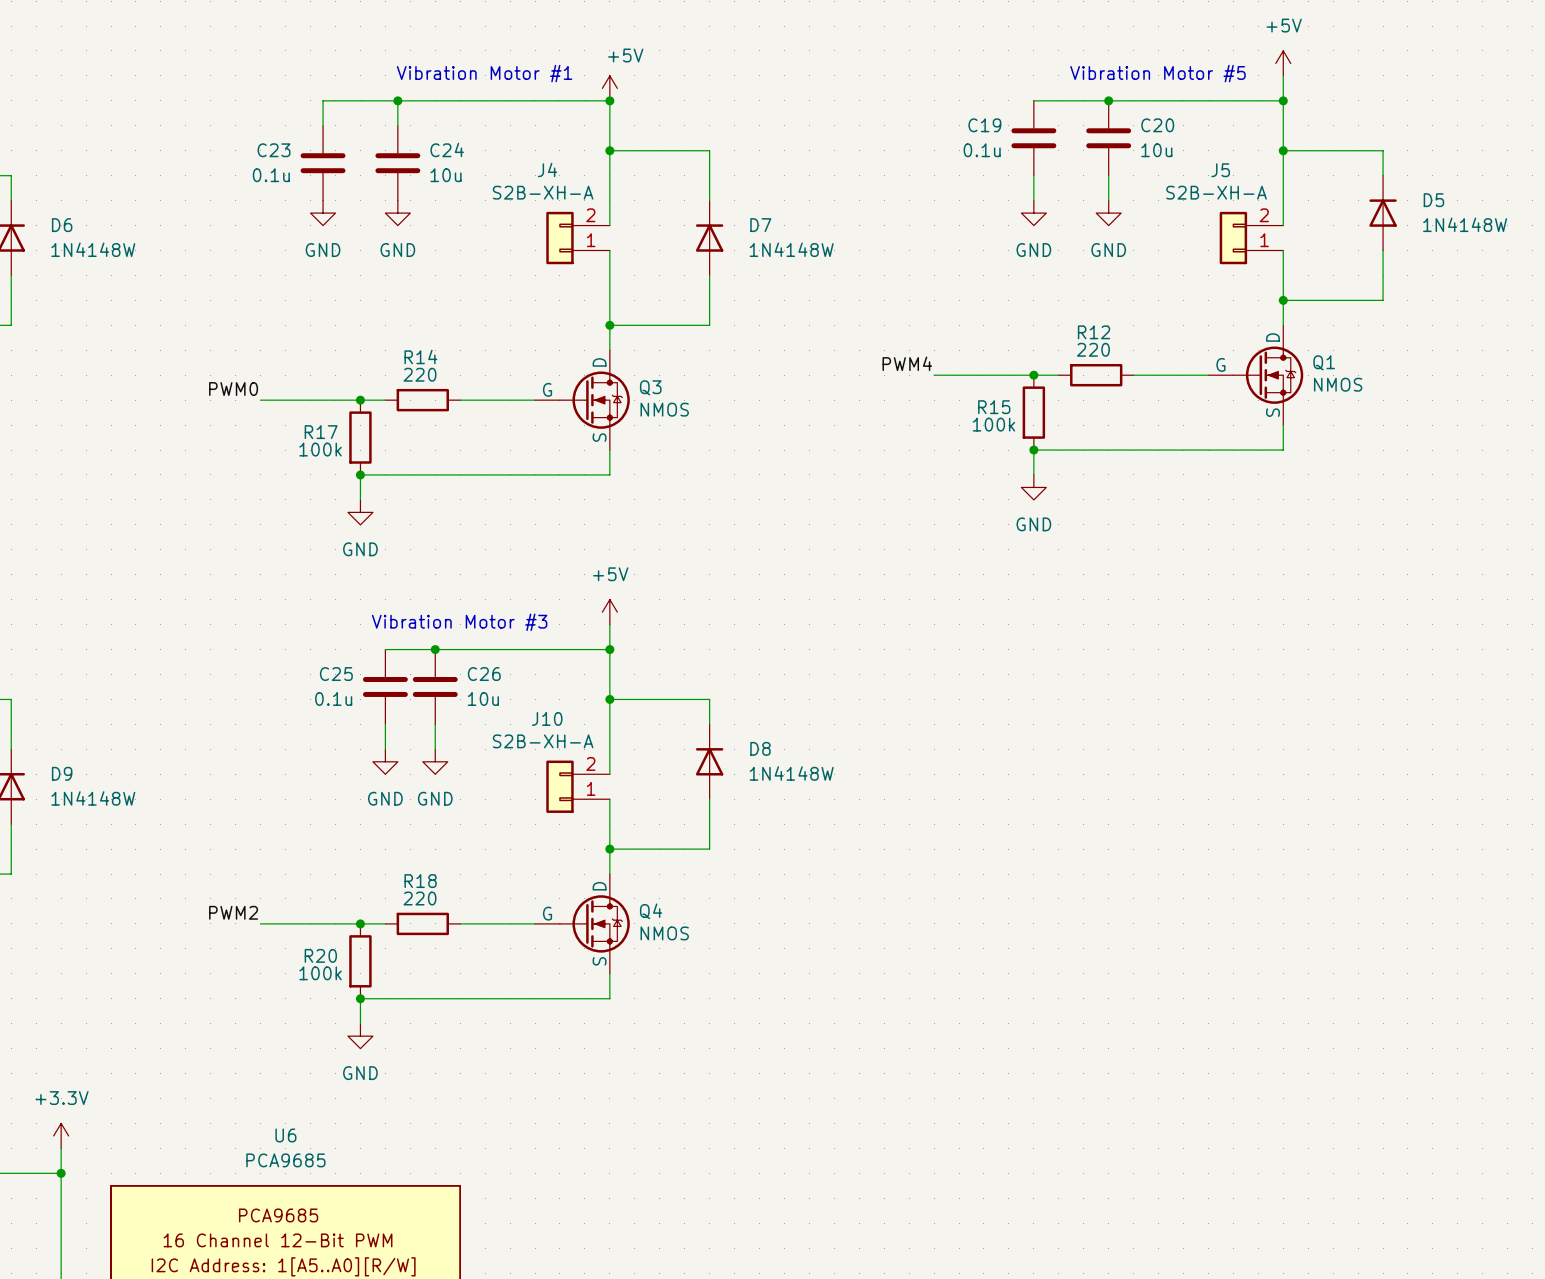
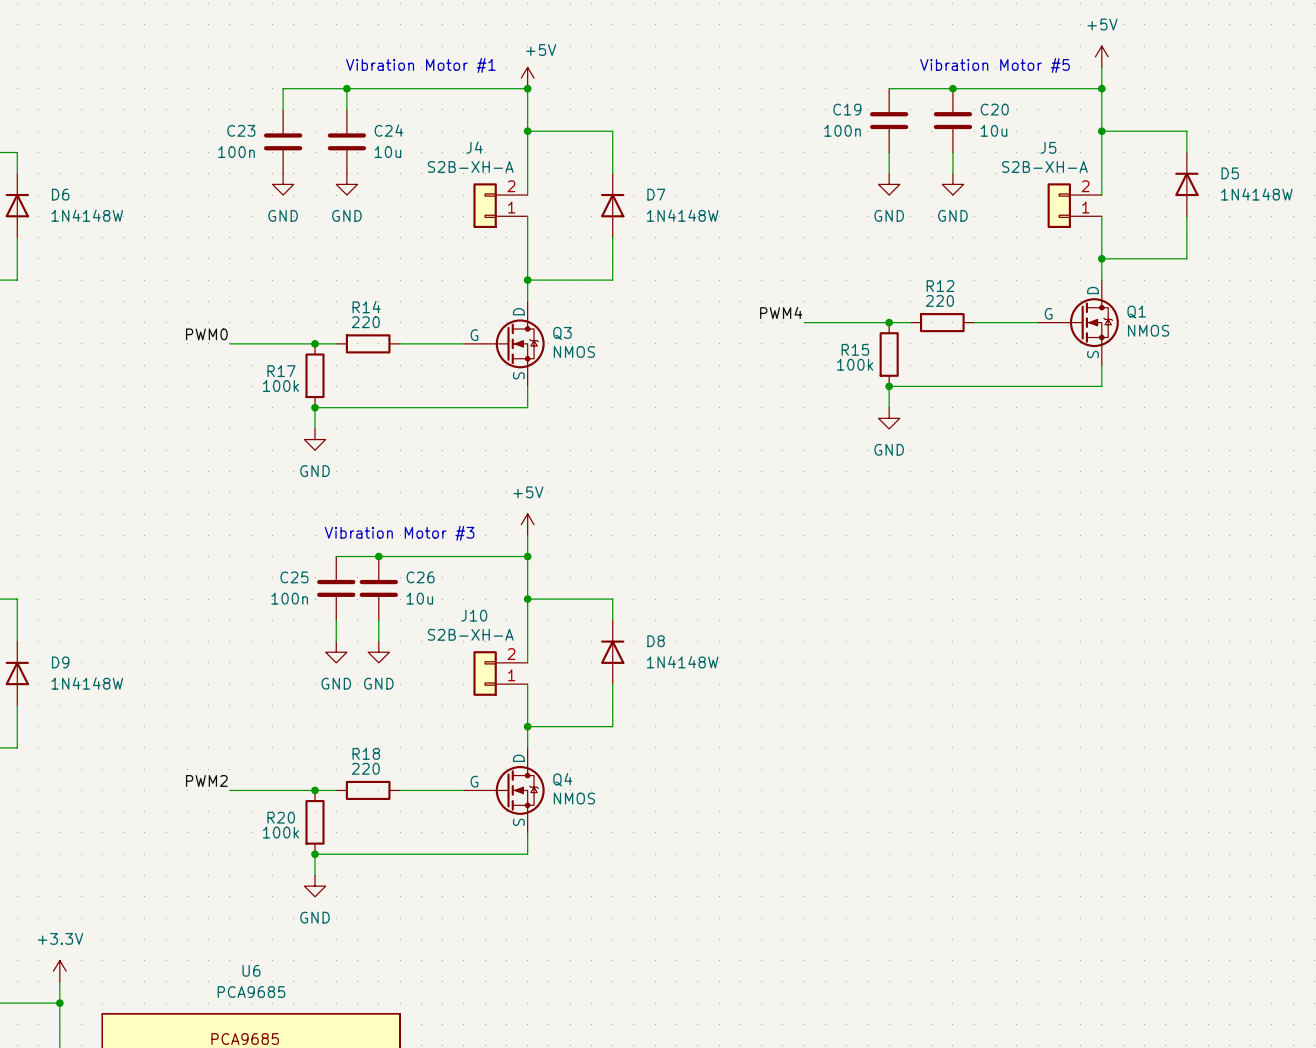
C19 value: 0.1u (982, 150) -> 100n (842, 130)
C23 value: 0.1u (271, 175) -> 100n (236, 152)
C25 value: 0.1u (333, 698) -> 100n (289, 598)

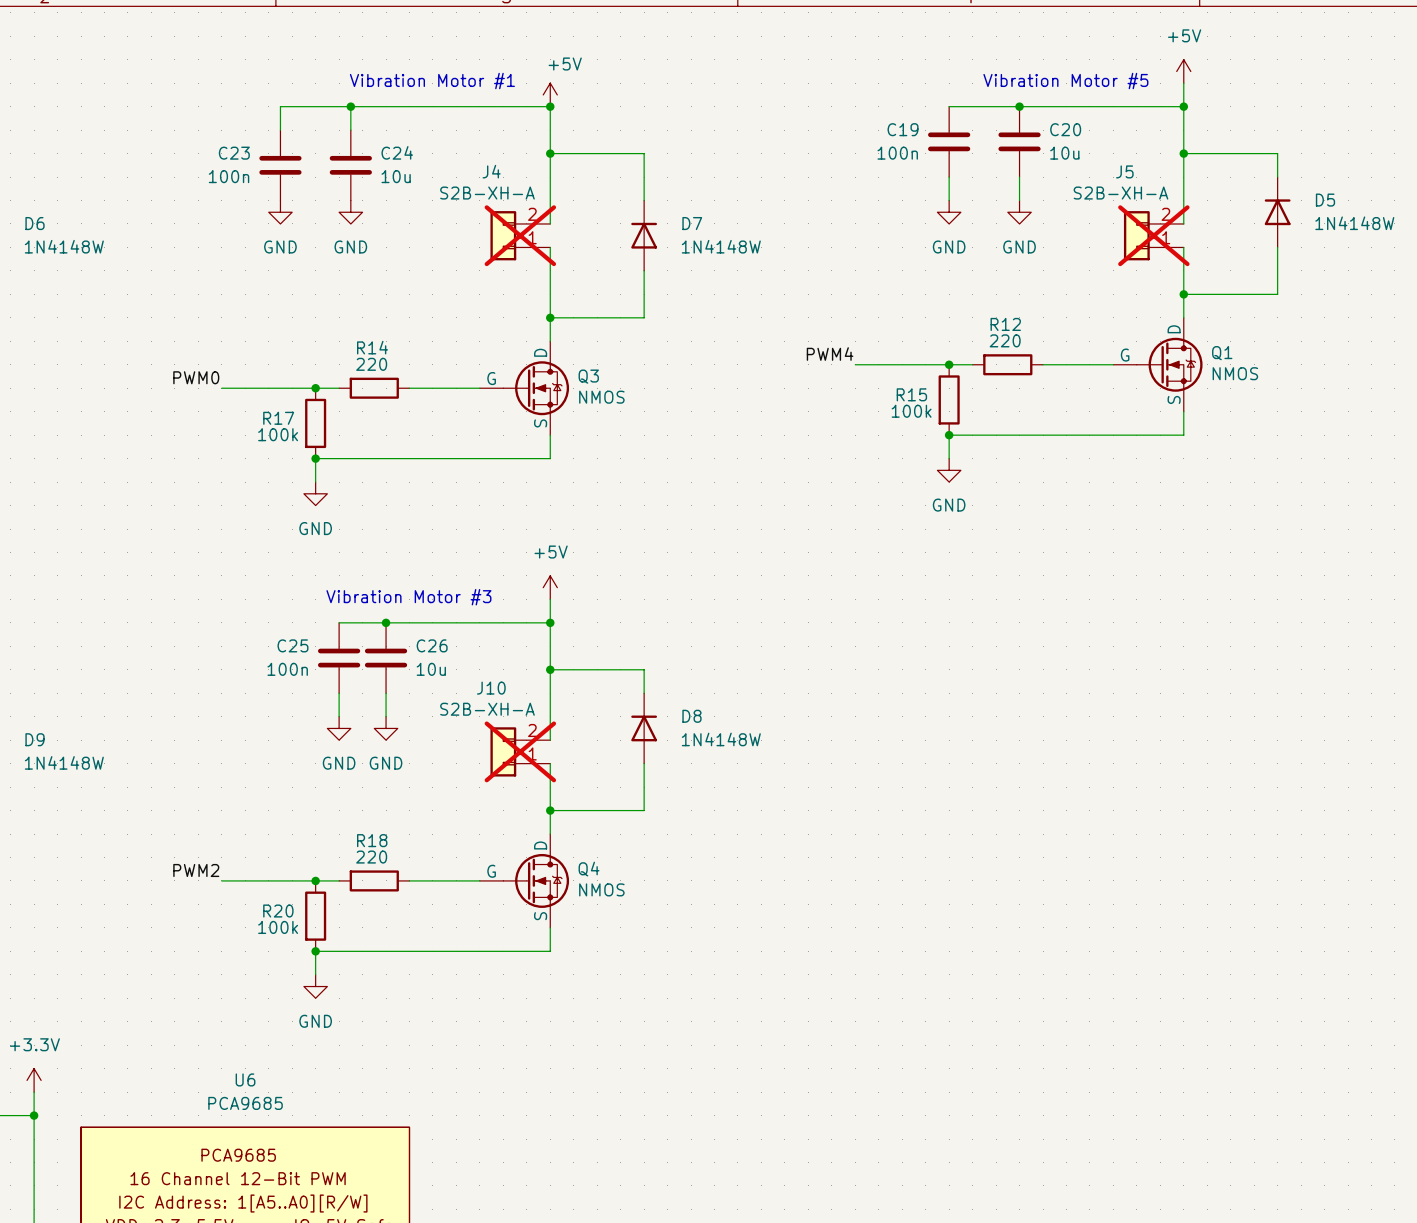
J4 do-not-place cross: none -> (520, 235)
J5 do-not-place cross: none -> (1153, 235)
J10 do-not-place cross: none -> (520, 751)

